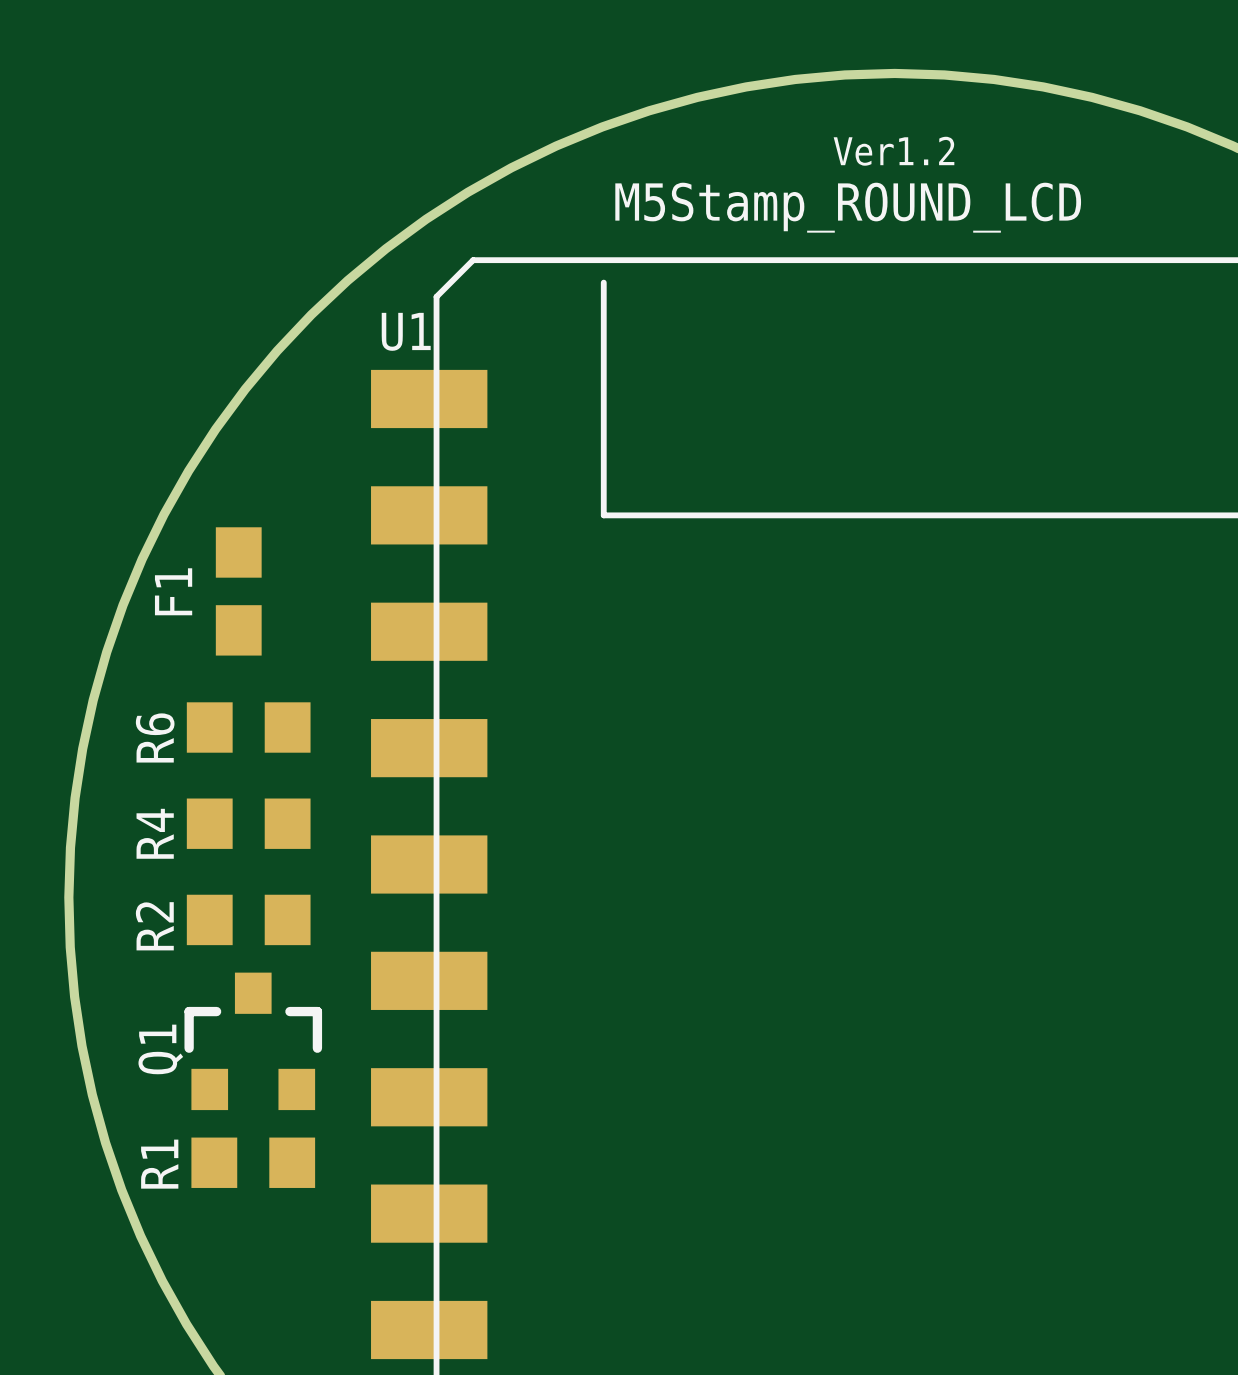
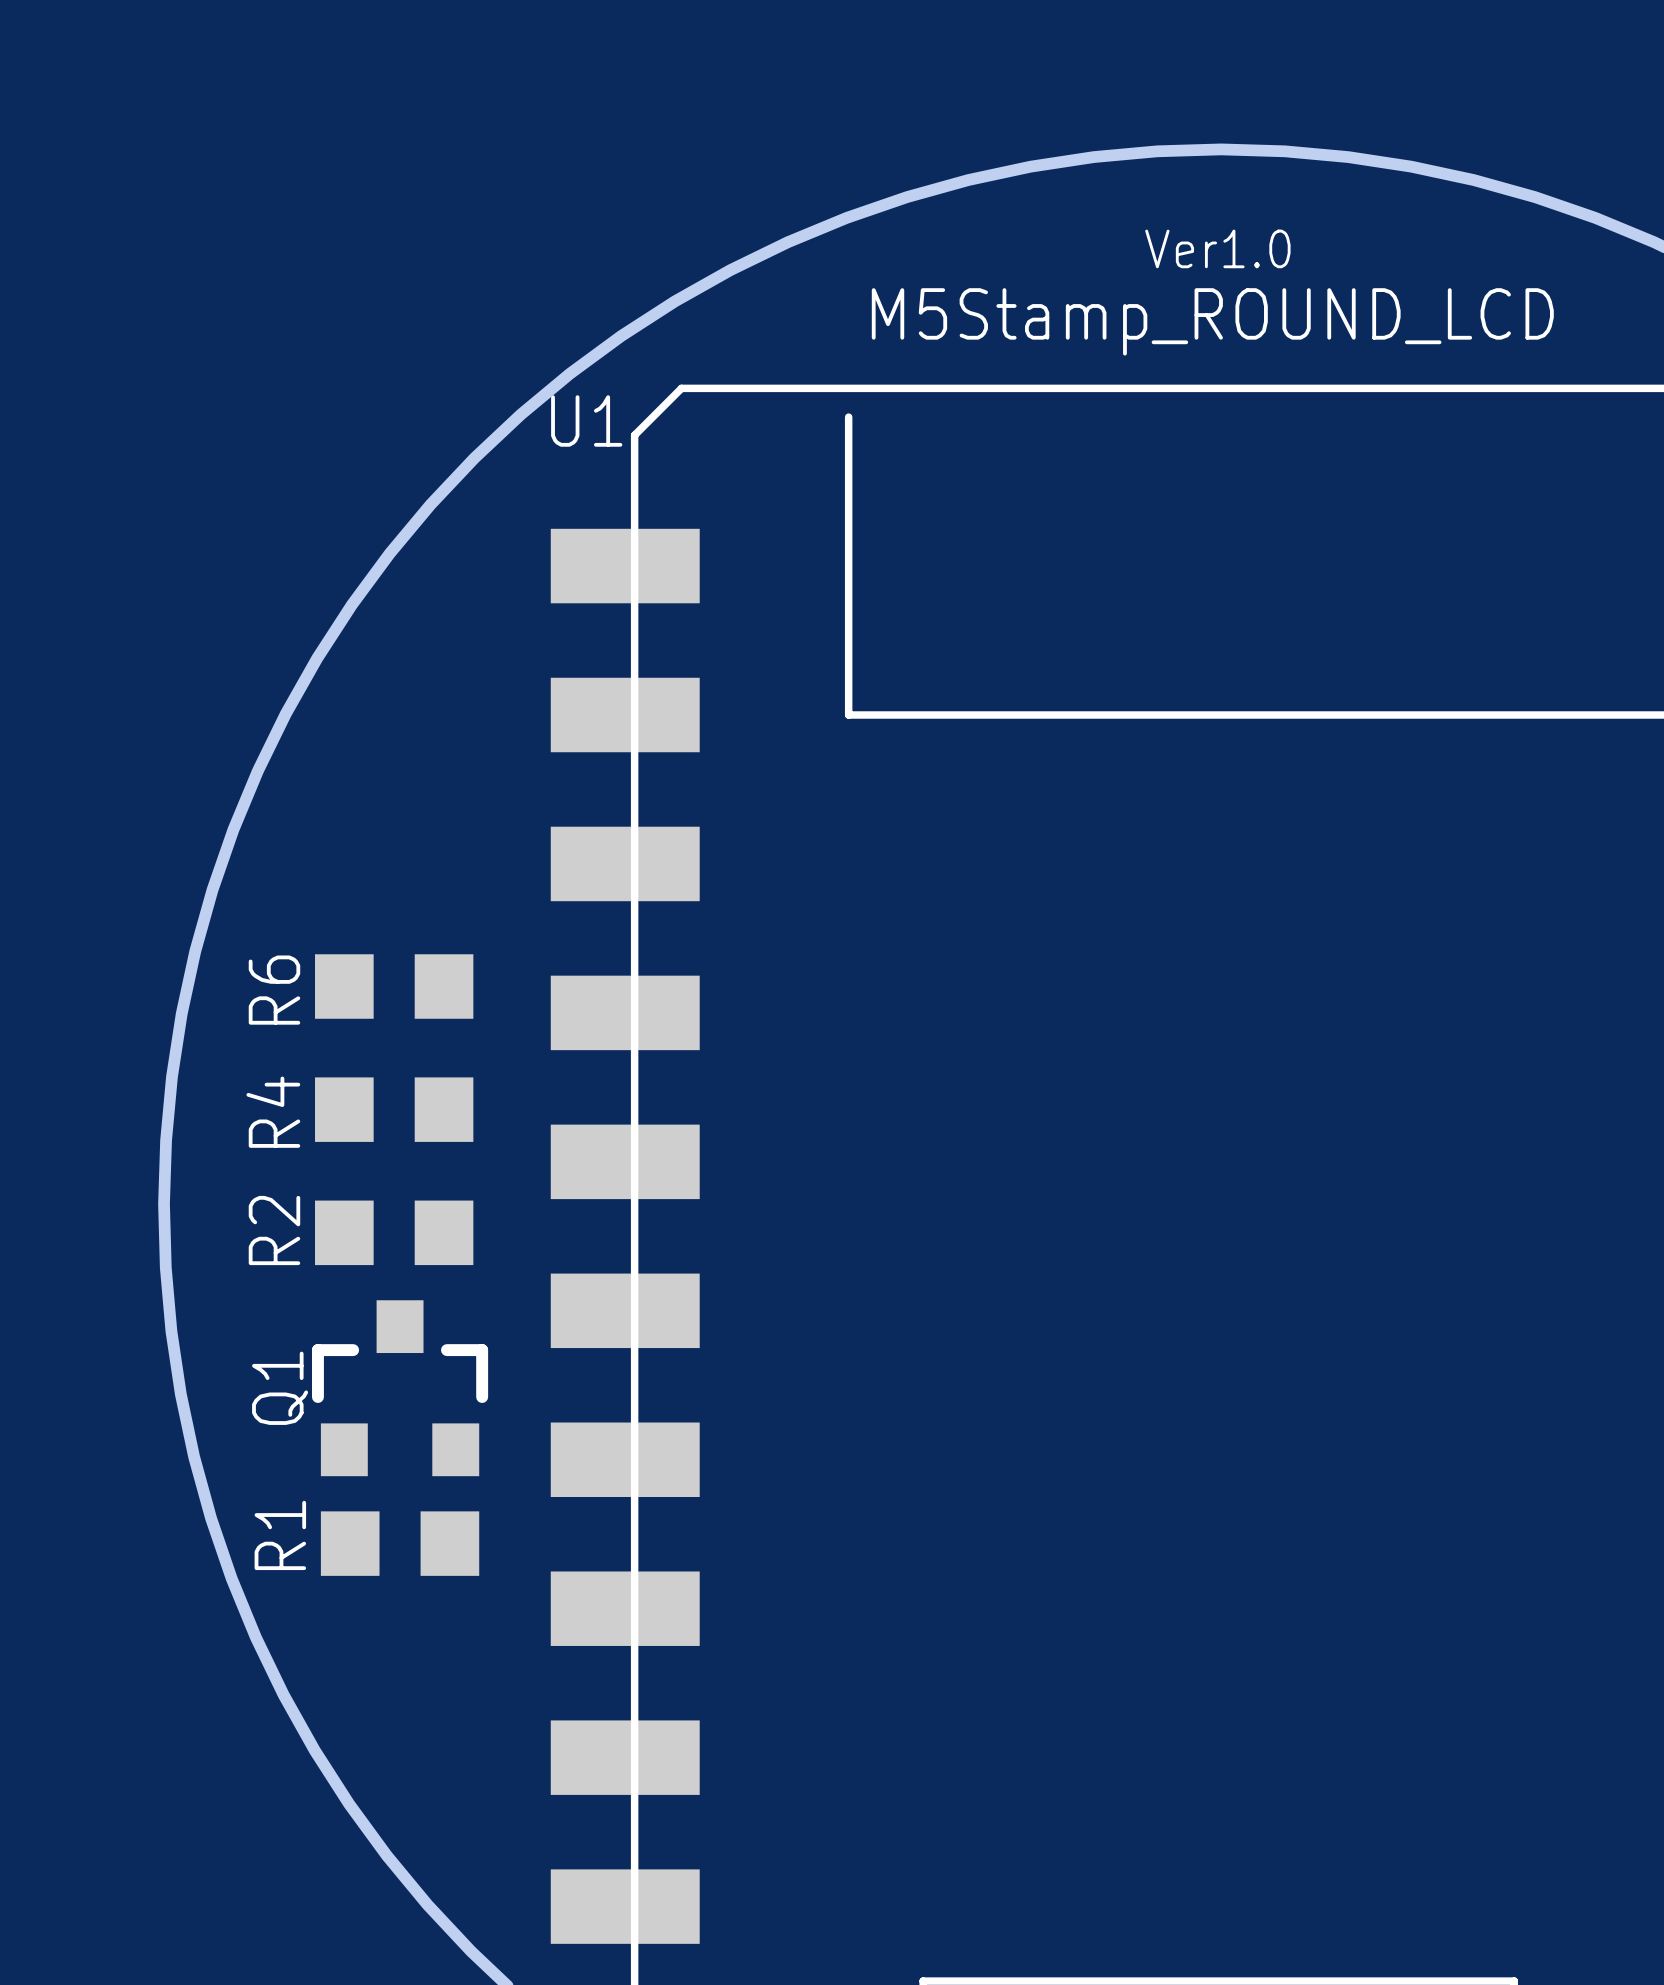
text: Ver1.2 (894, 151) -> Ver1.0 (1217, 248)
U1 name position: U1 (406, 331) -> U1 (586, 420)
F1: (238, 591) -> none

